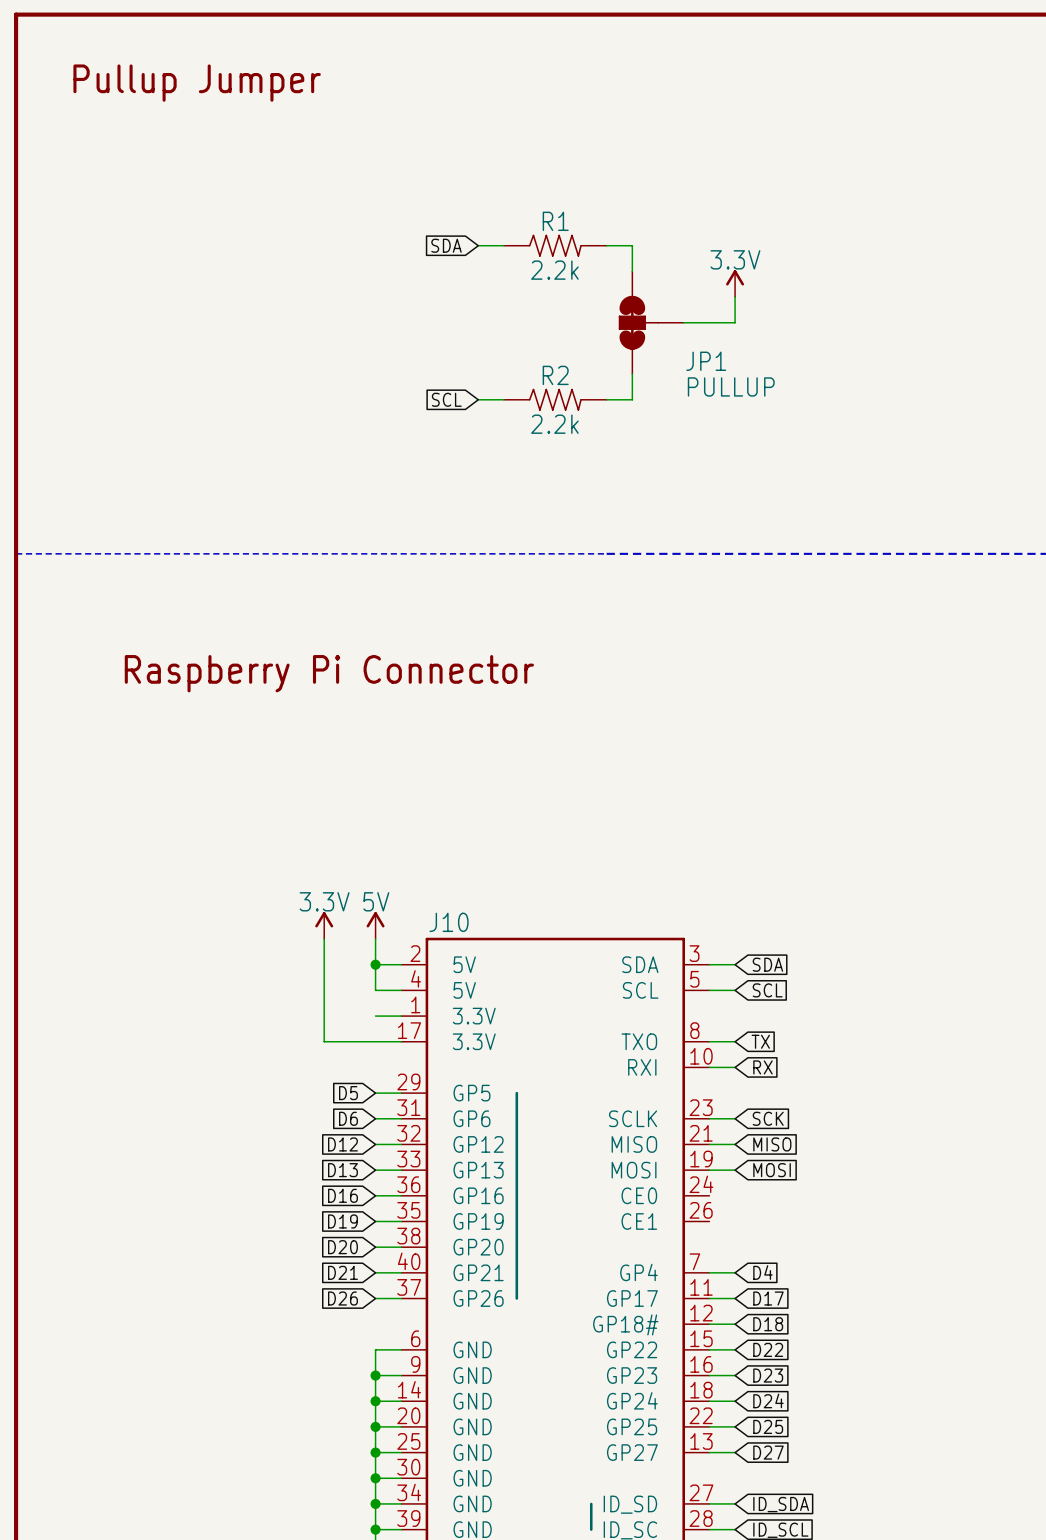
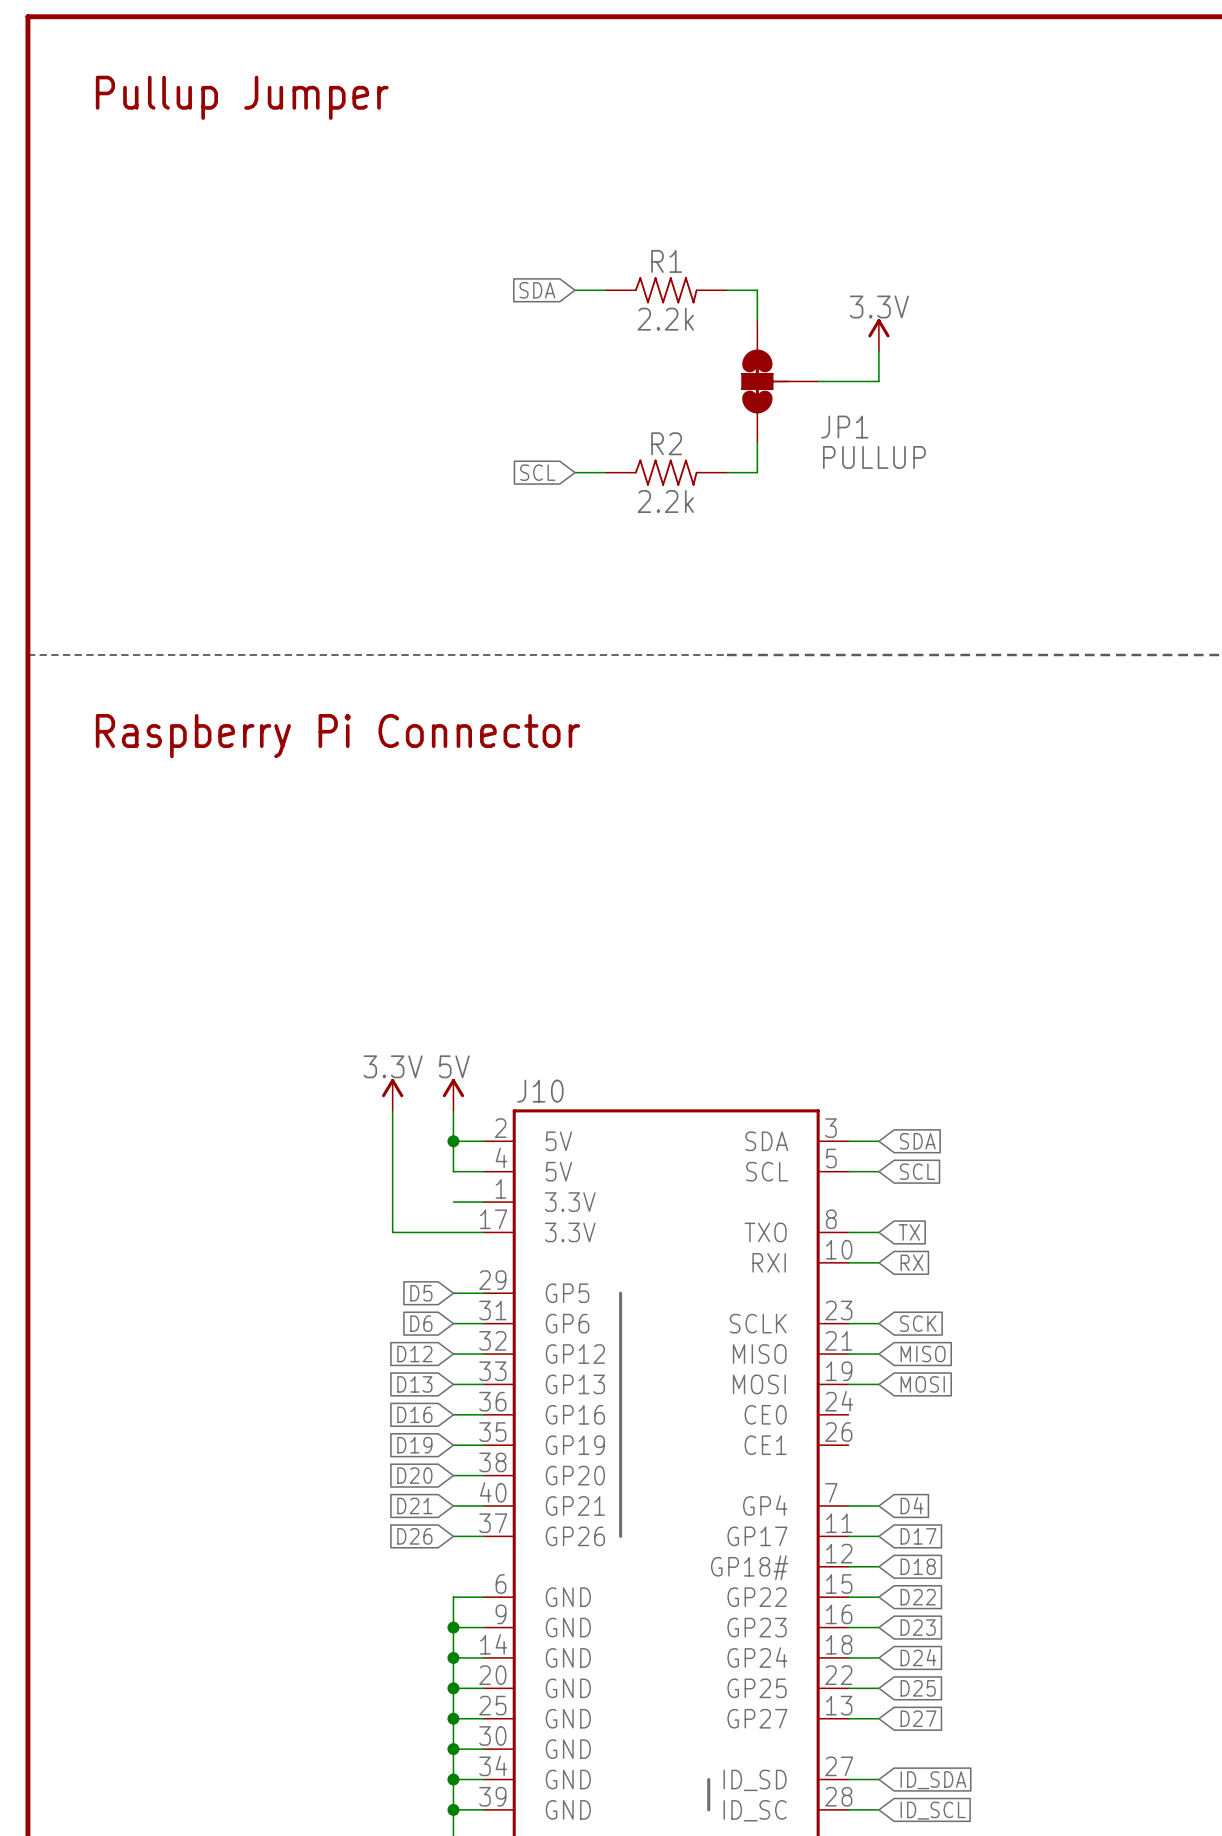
text position: Raspberry Pi Connector (329, 673) -> Raspberry Pi Connector (337, 736)

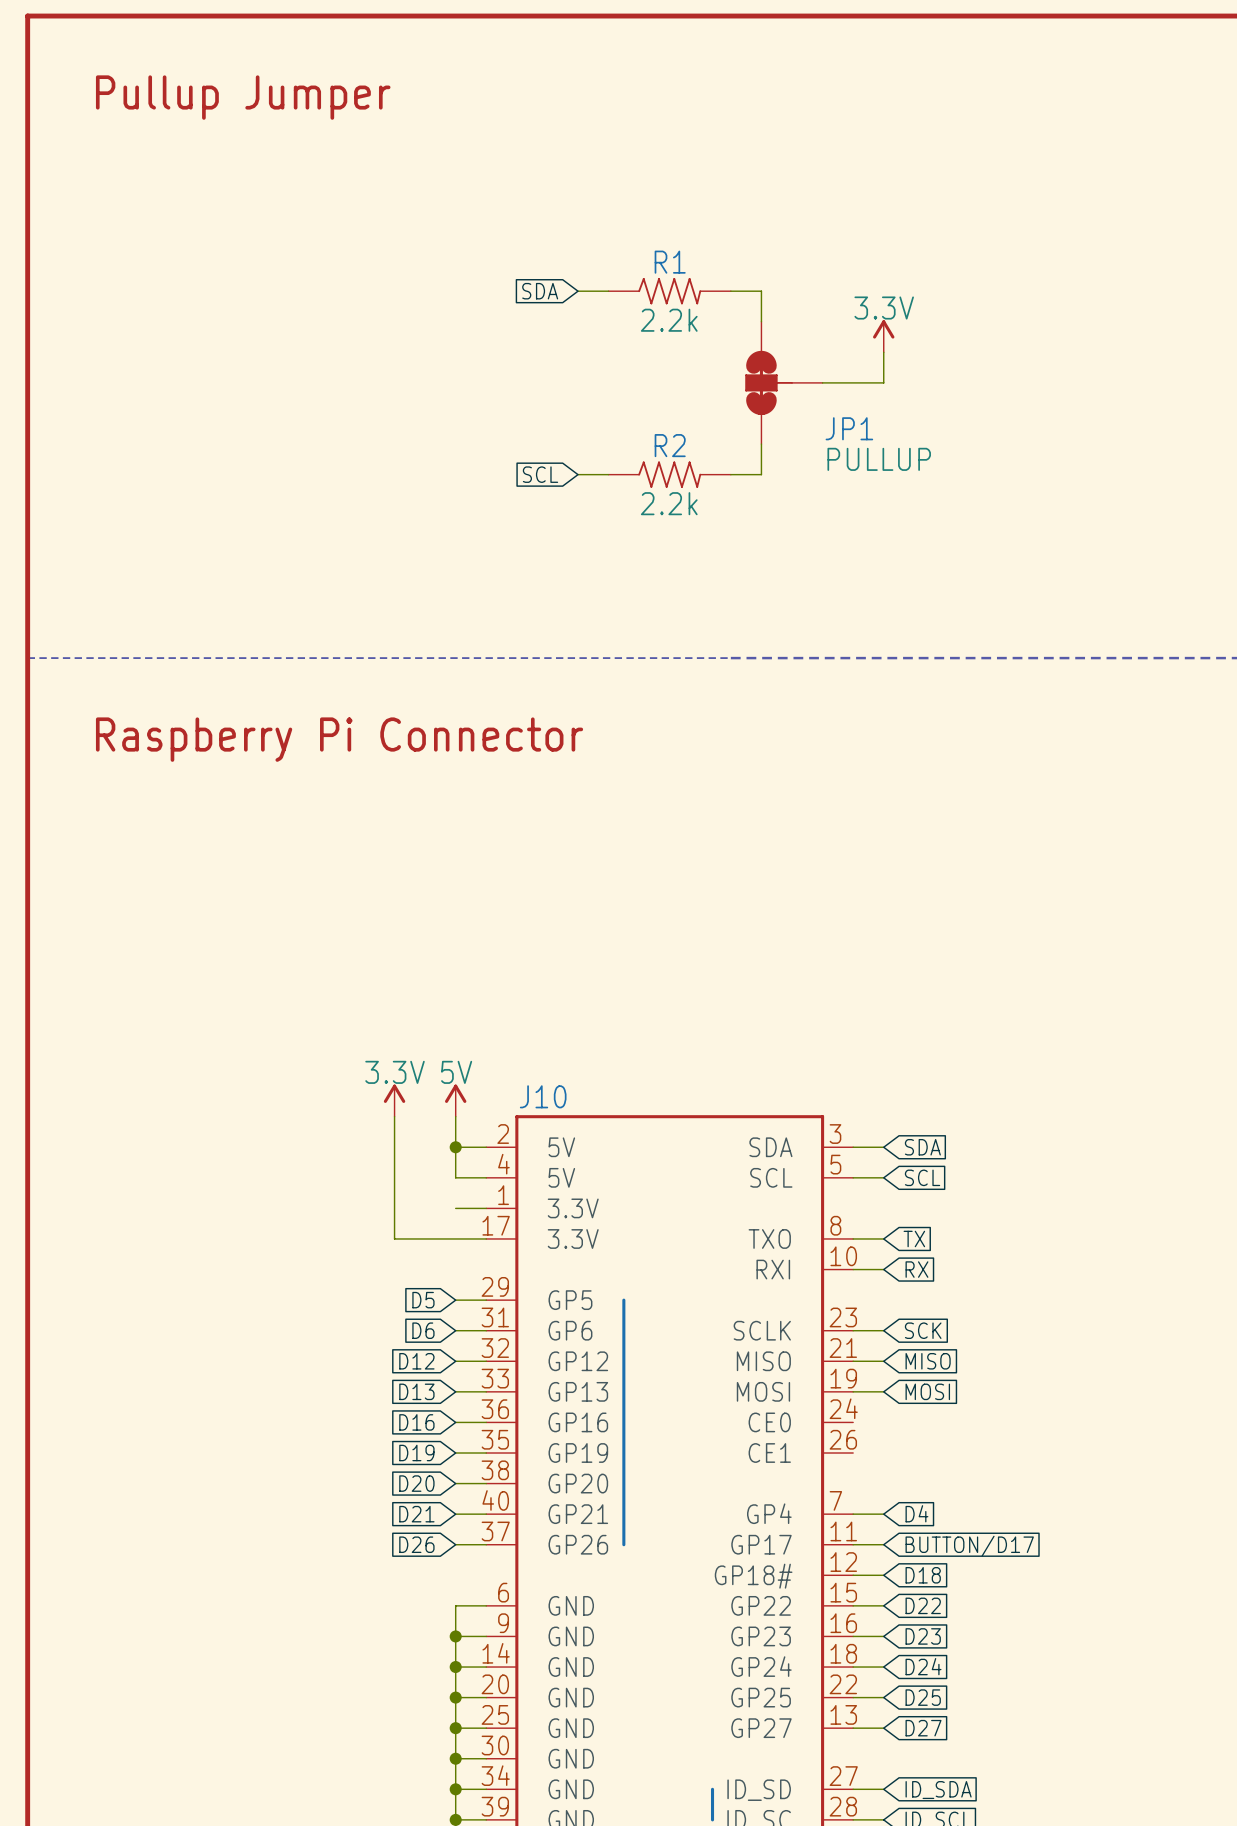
global label: D17 (918, 1536) -> BUTTON/D17 (969, 1546)

